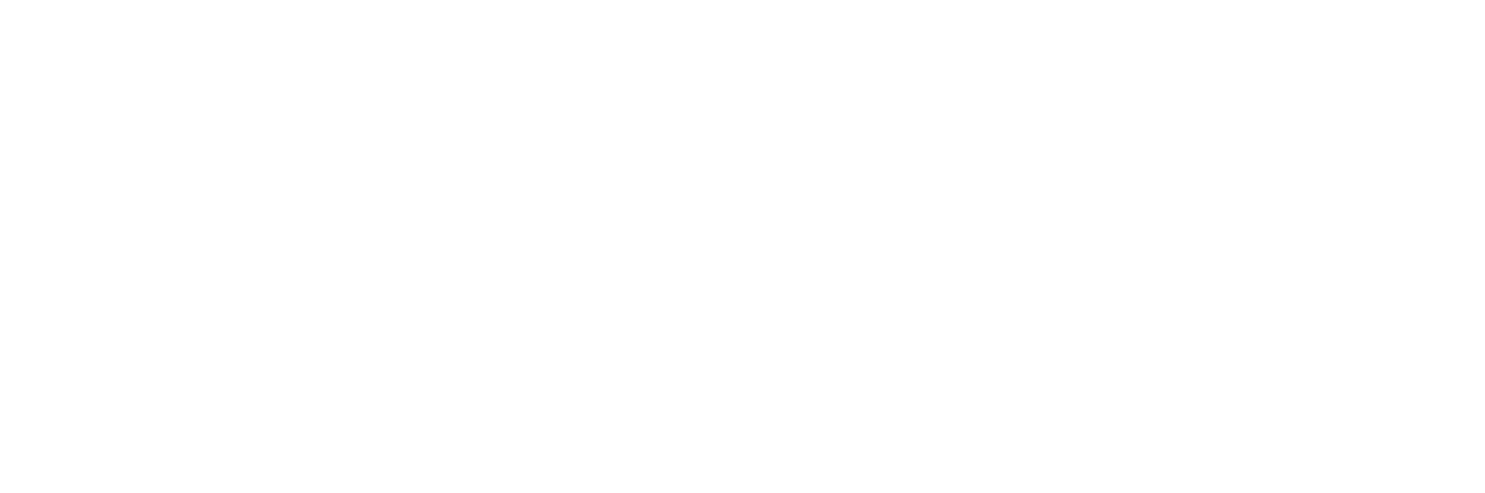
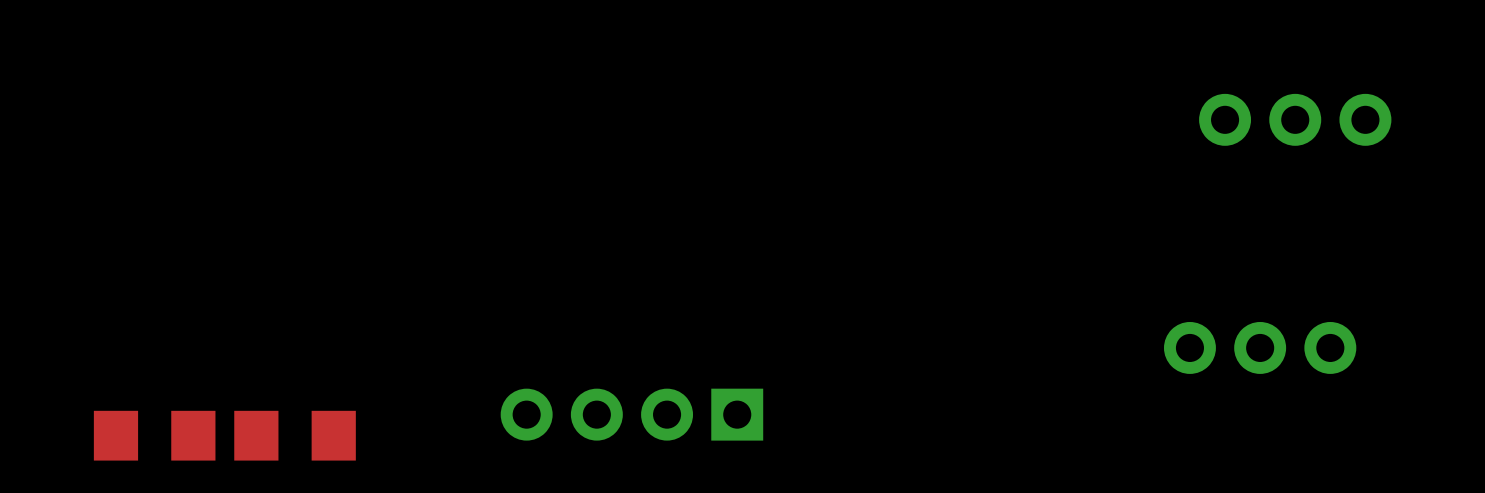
part: none -> (1295, 119)
part: none -> (1260, 347)
part: none -> (631, 414)
part: none -> (154, 435)
part: none -> (295, 435)

